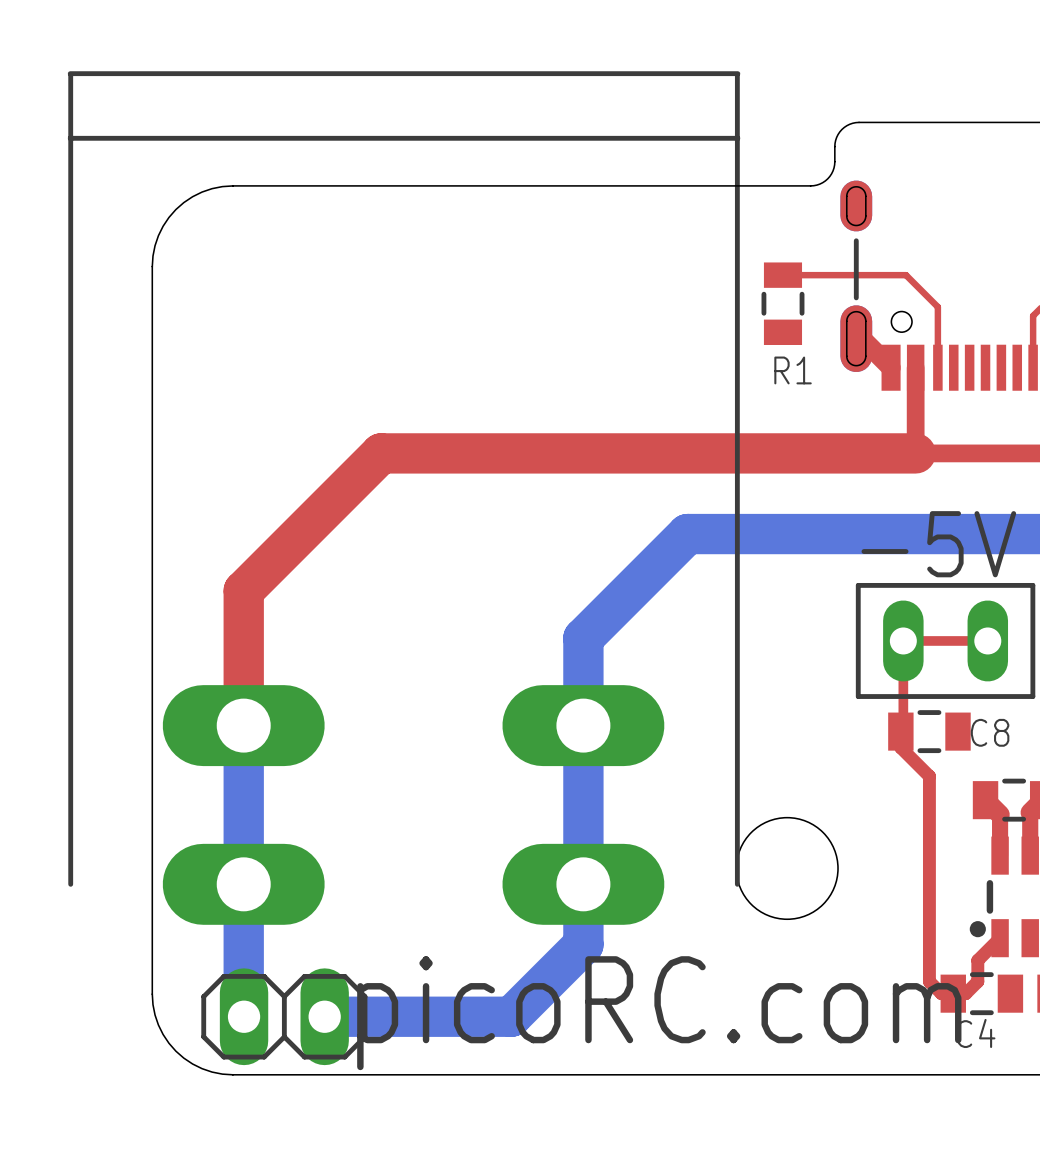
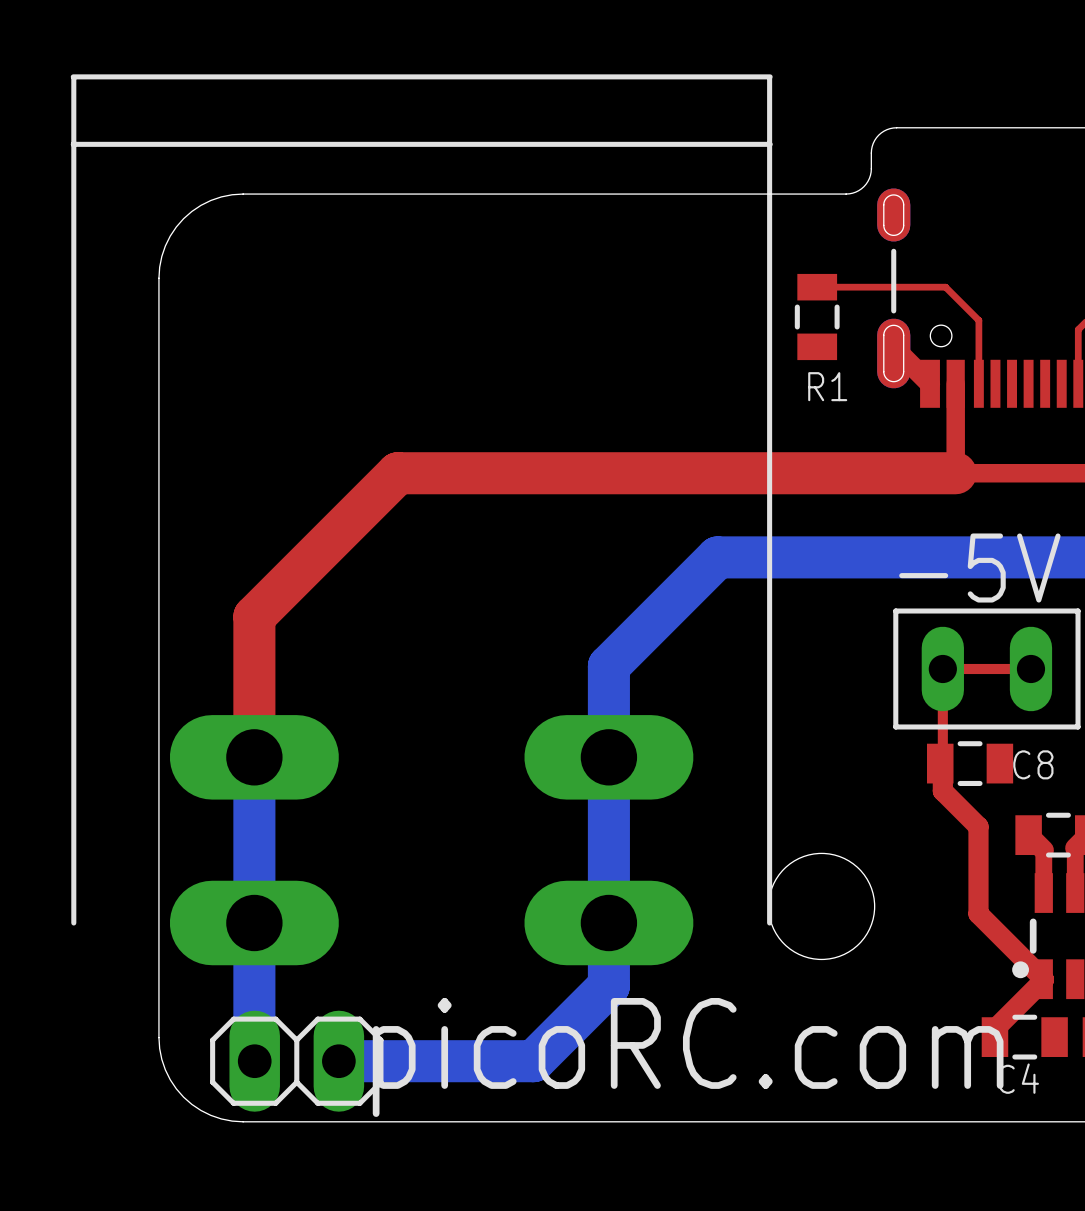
top track: none -> (942, 761) (942, 791) (978, 826) (978, 913) (1043, 979) (994, 1029) (994, 1037)
top track: (900, 731) (900, 747) (929, 776) (929, 981) (941, 993) (965, 993) (977, 981) (977, 960) (1000, 938) -> none

